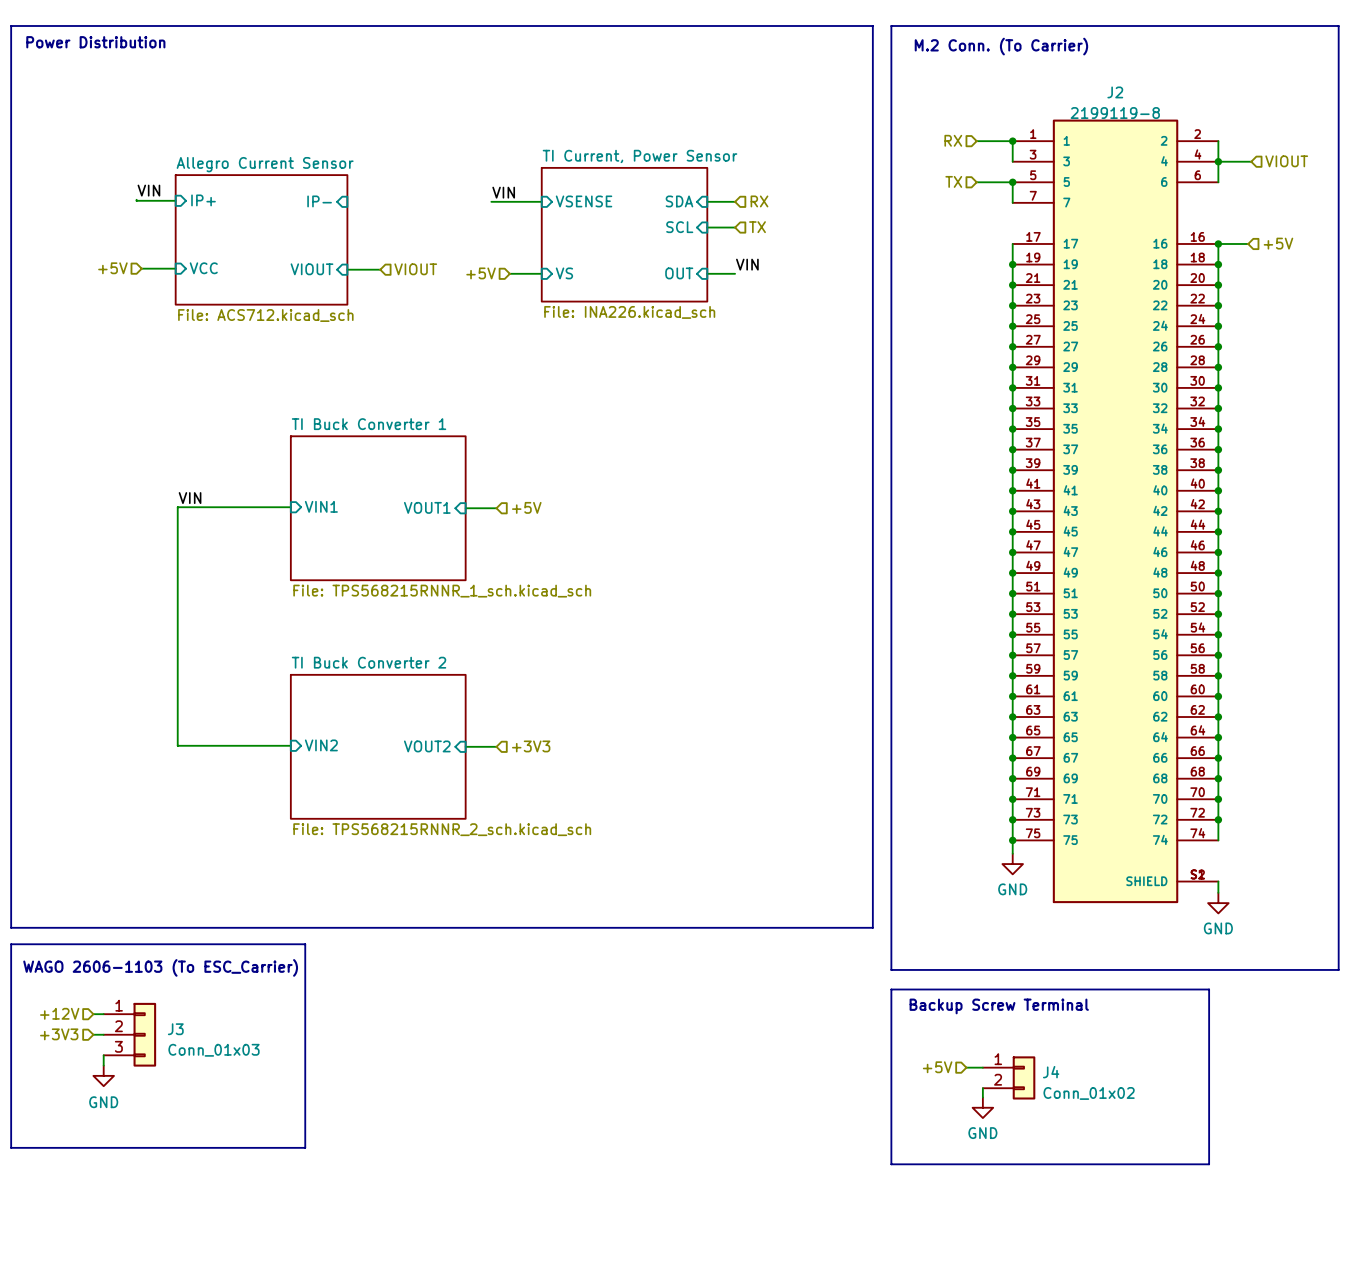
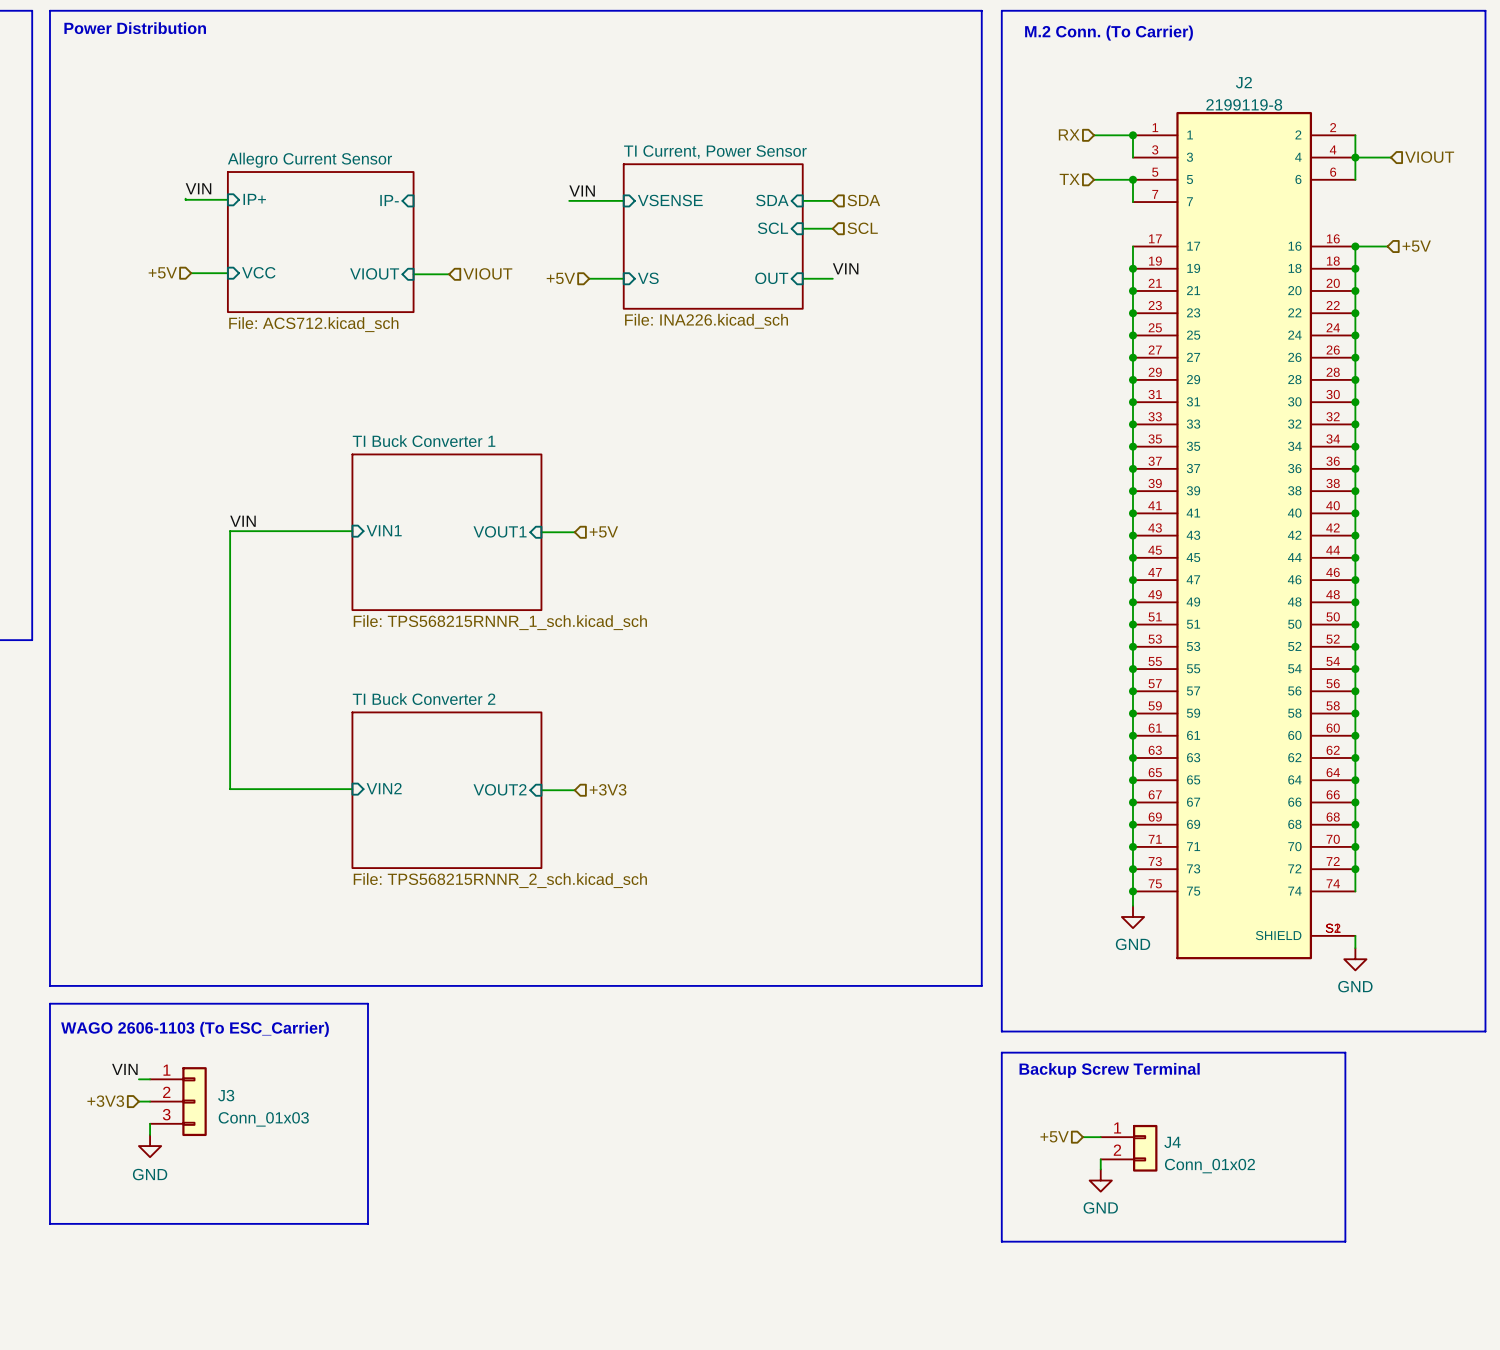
hierarchical label: RX (759, 201) -> SDA (863, 200)
hierarchical label: TX (757, 227) -> SCL (862, 228)
label: none -> VIN (124, 1069)
hierarchical label: +12V (59, 1013) -> none

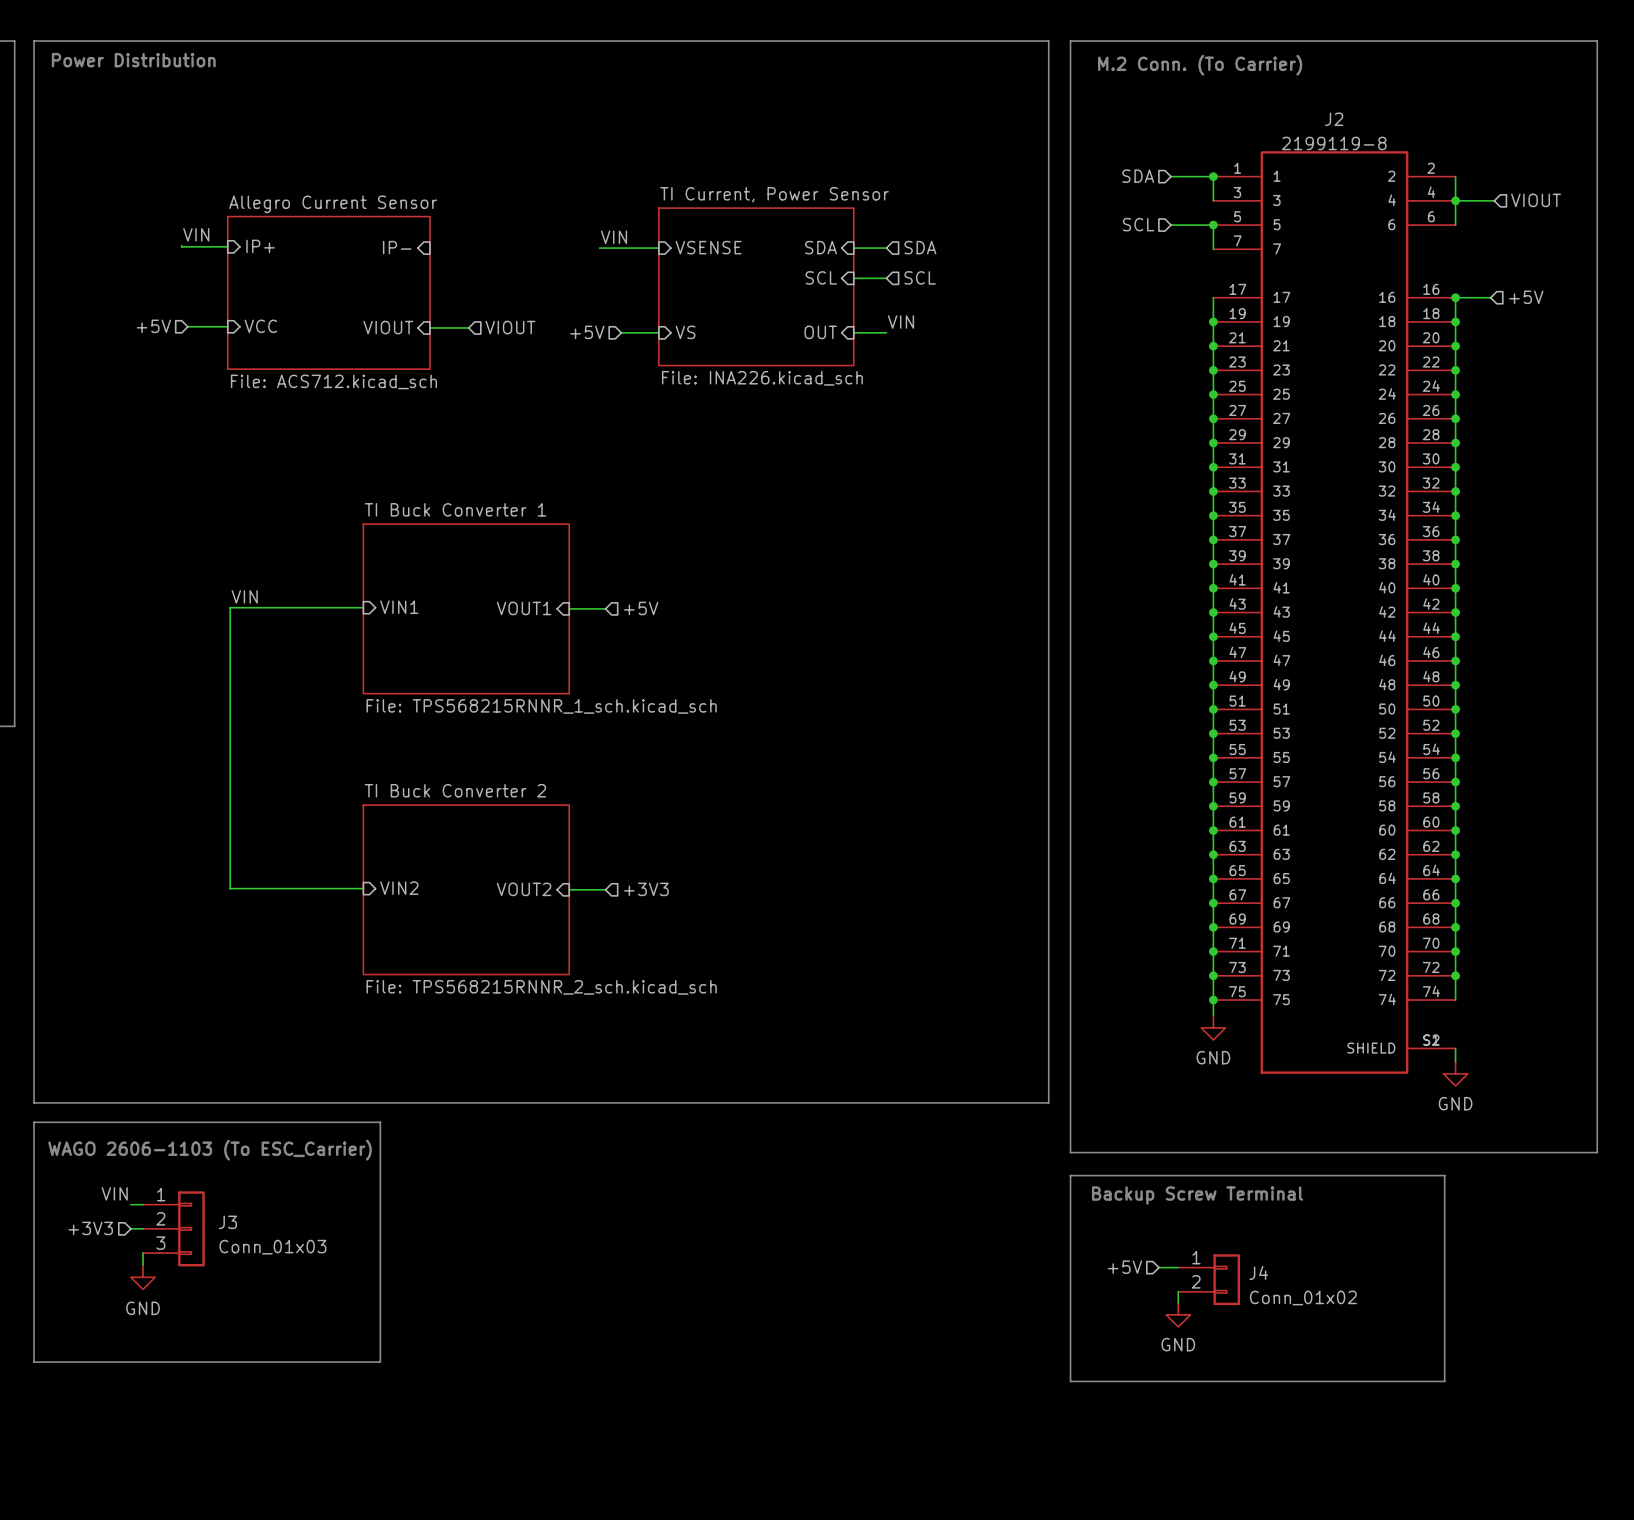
hierarchical label: RX (1069, 134) -> SDA (1138, 176)
hierarchical label: TX (1069, 179) -> SCL (1138, 224)

